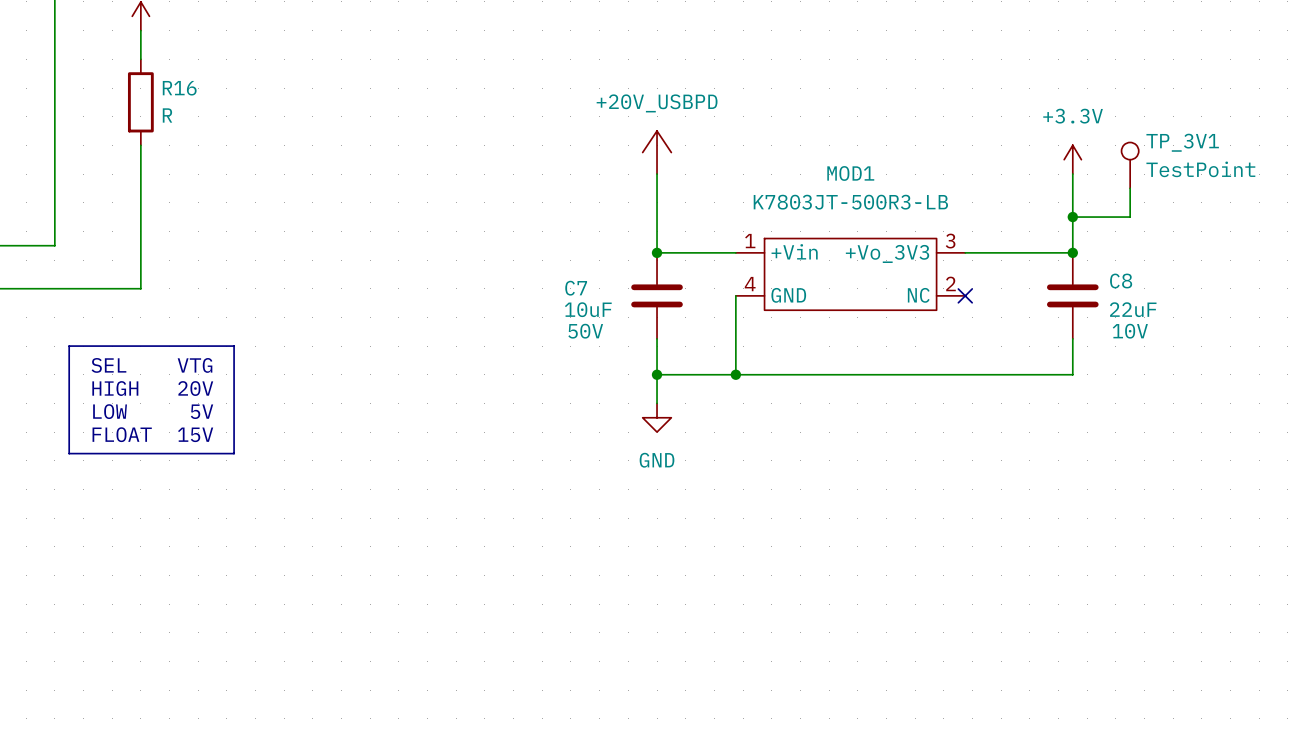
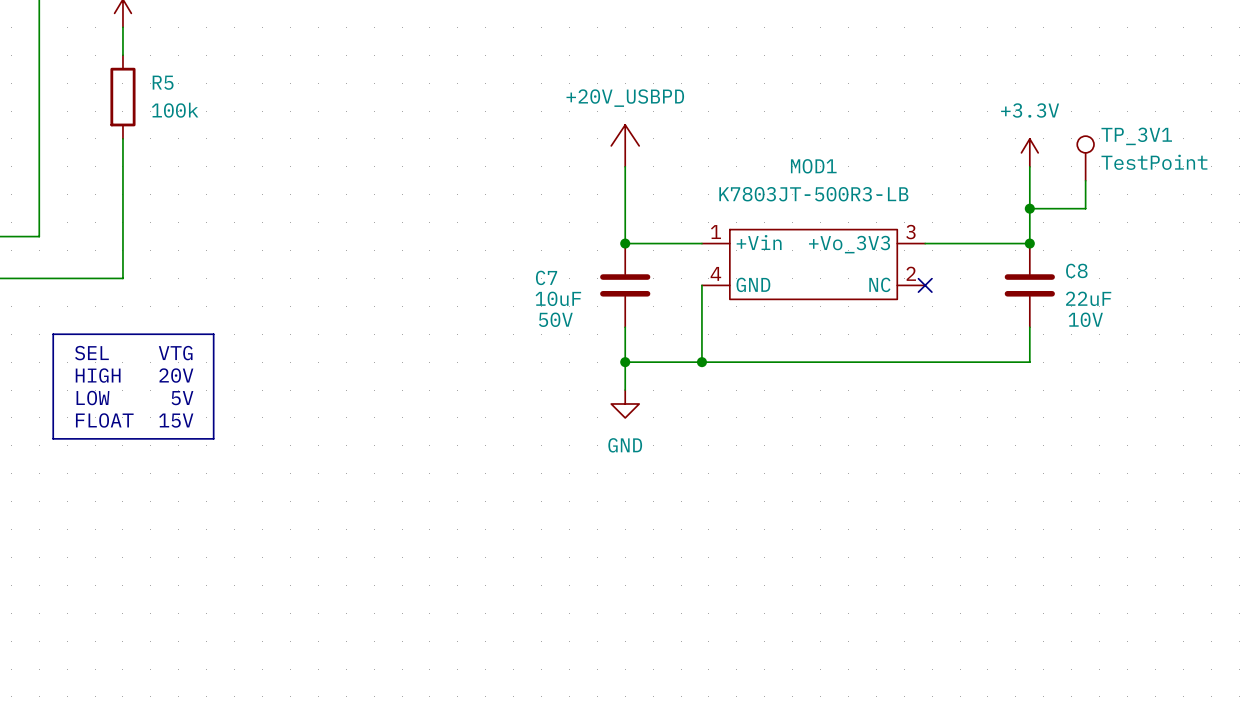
R16 name: R16 (179, 88) -> R5 (163, 82)
R16 value: R (167, 115) -> 100k (175, 110)

